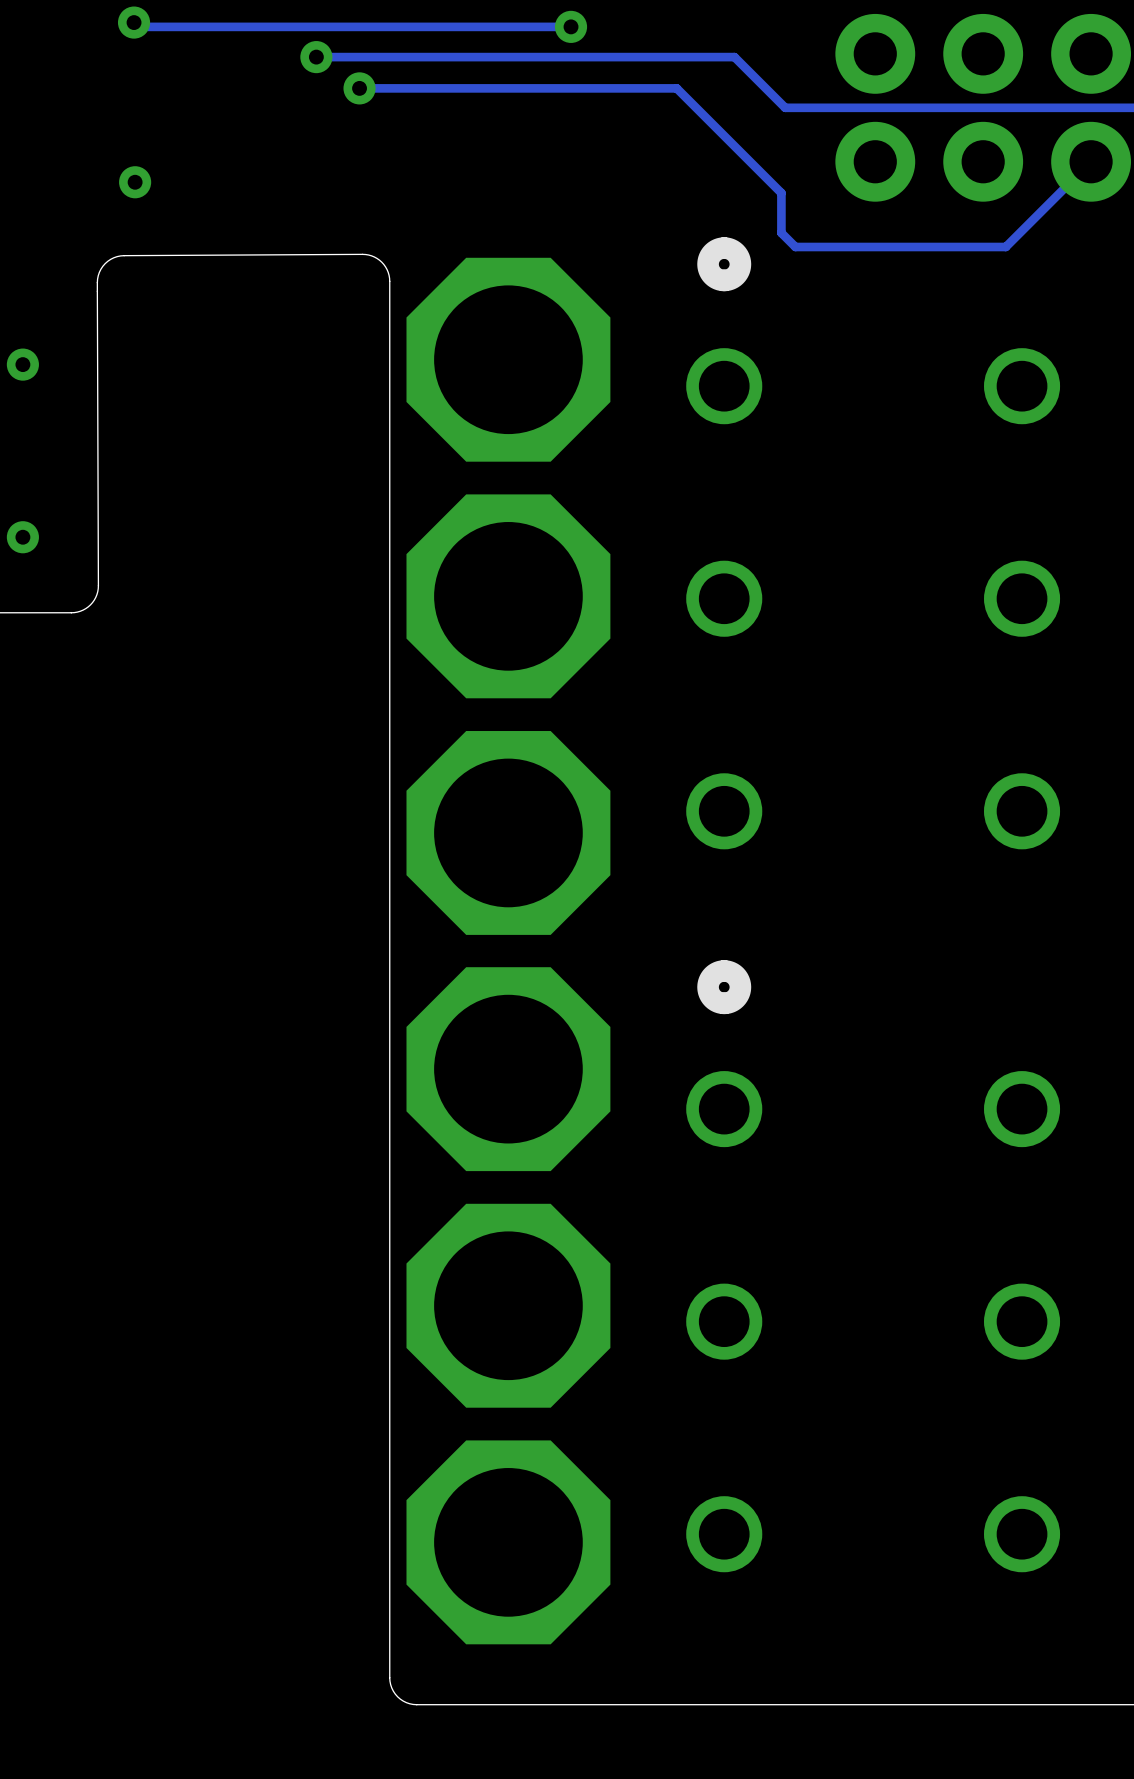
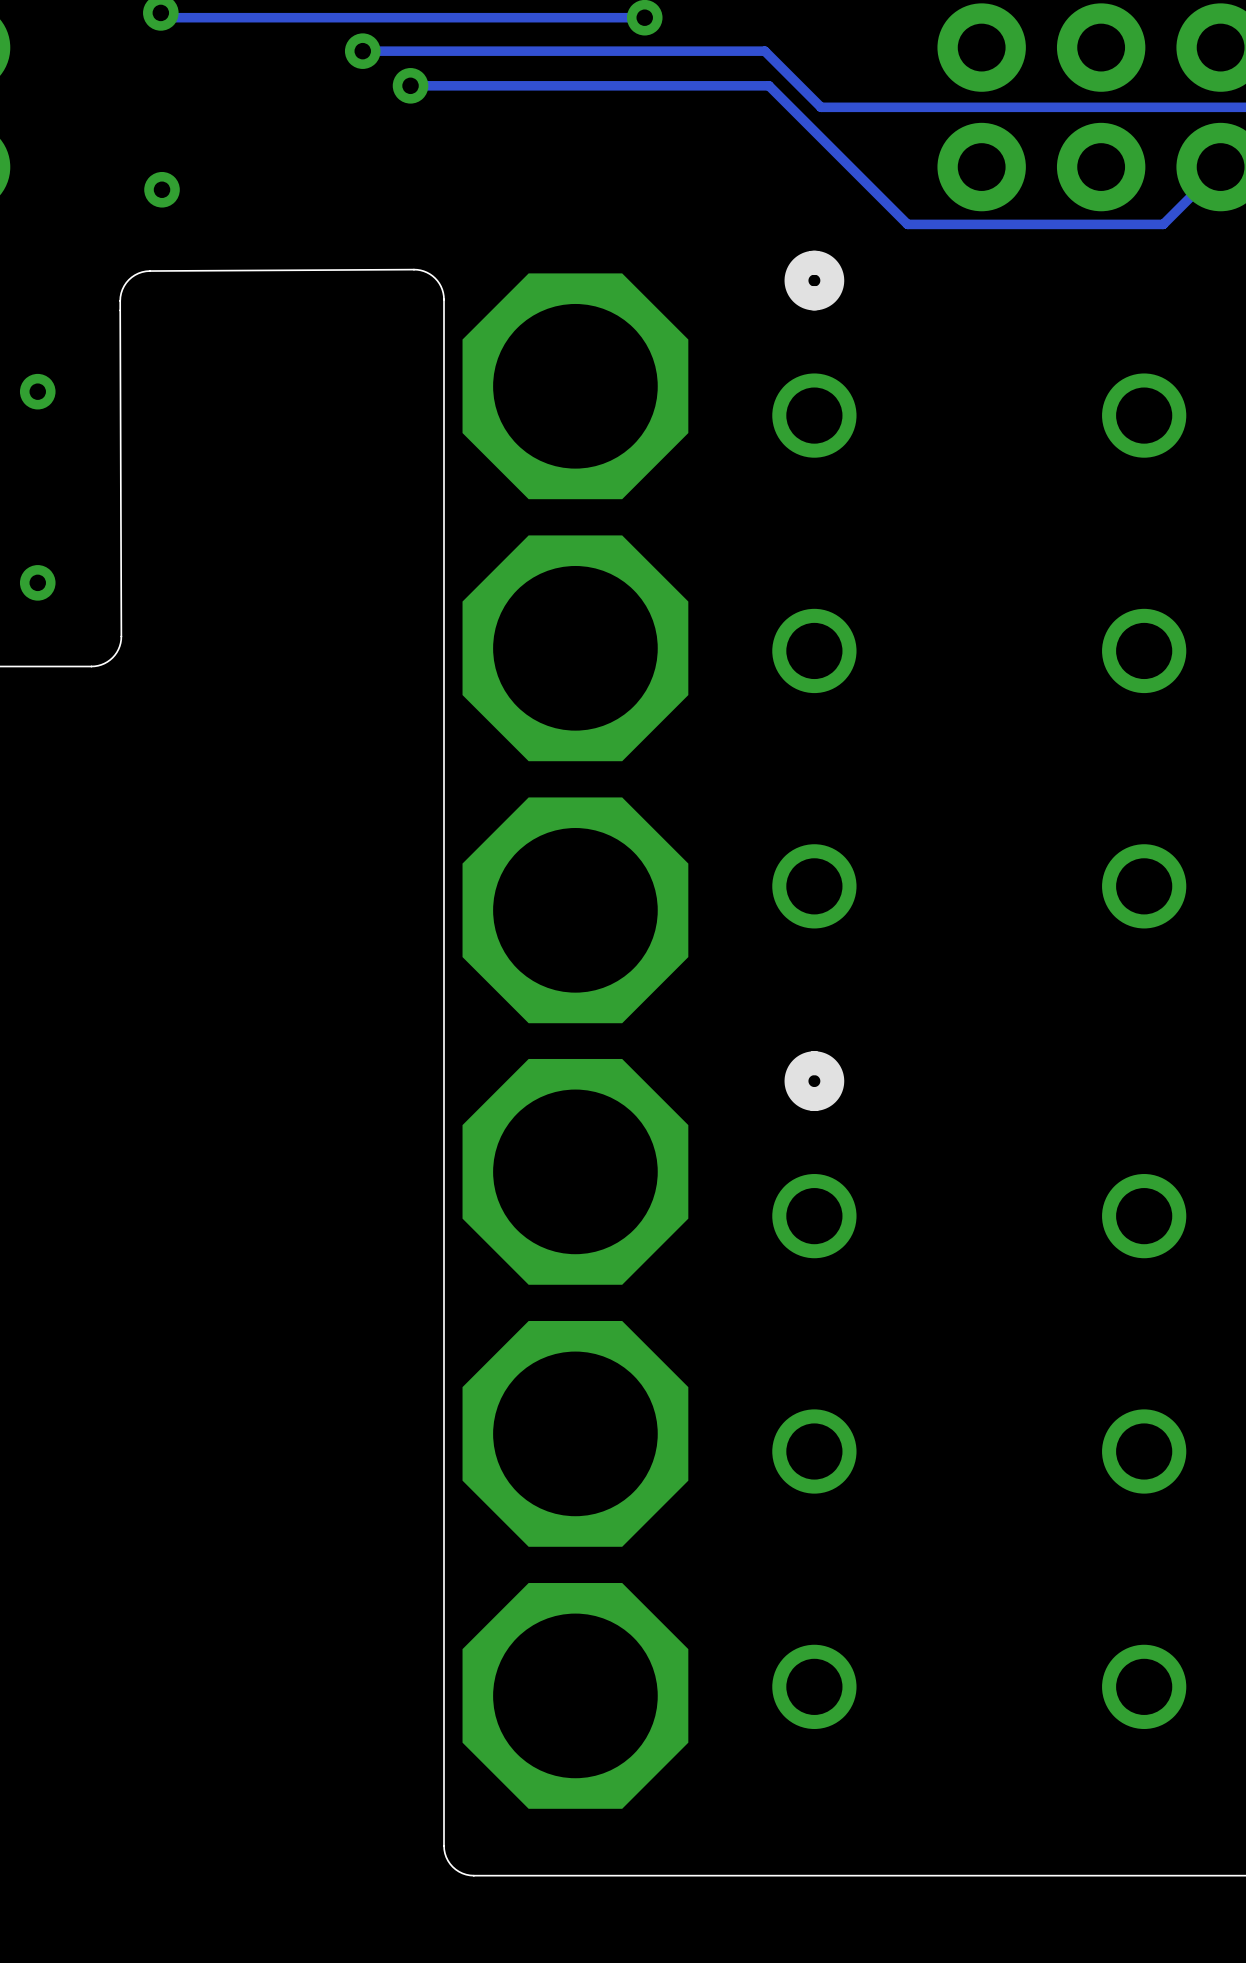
track: (679, 57) (734, 57) (785, 107) -> (764, 51) (821, 107) (881, 107)
track: (676, 88) (781, 193) (781, 232) (795, 246) (1005, 246) (1039, 213) -> (761, 85) (768, 85) (907, 224) (1163, 224)

